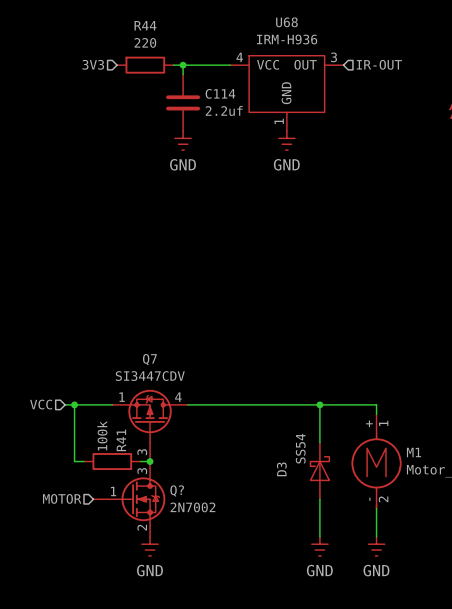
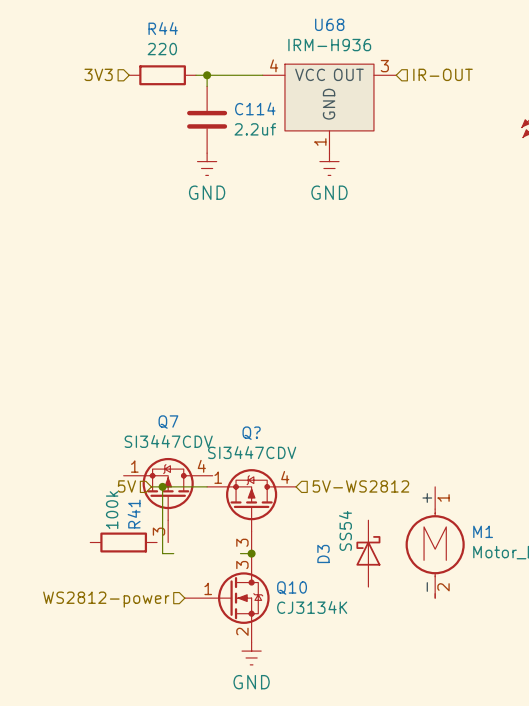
hierarchical label: VCC (41, 404) -> none
wire: (65, 404) (112, 404) -> (151, 486) (207, 486)
wire: (74, 404) (74, 461) (83, 461) -> (162, 486) (162, 553) (173, 553)
junction: (74, 404) -> none
wire: (187, 404) (376, 404) (376, 414) -> none
wire: (319, 404) (319, 442) -> none
junction: (319, 404) -> none
hierarchical label: none -> 5V-WS2812 (360, 486)
hierarchical label: none -> 5V (126, 486)
junction: none -> (162, 486)
Q?: none -> SI3447CDV (251, 511)
wire: (140, 461) (150, 461) -> (240, 553) (251, 553)
junction: (150, 461) -> none
junction: none -> (251, 553)
hierarchical label: MOTOR (62, 498) -> none
Q?: 2N7002 (129, 499) -> none
wire: (319, 499) (319, 537) -> none
Q10: none -> CJ3134K (227, 598)
wire: (376, 508) (376, 537) -> none
hierarchical label: none -> WS2812-power (106, 599)
power symbol: GND (150, 546) -> none
power symbol: GND (319, 546) -> none
power symbol: GND (376, 546) -> none
power symbol: none -> GND (251, 653)

